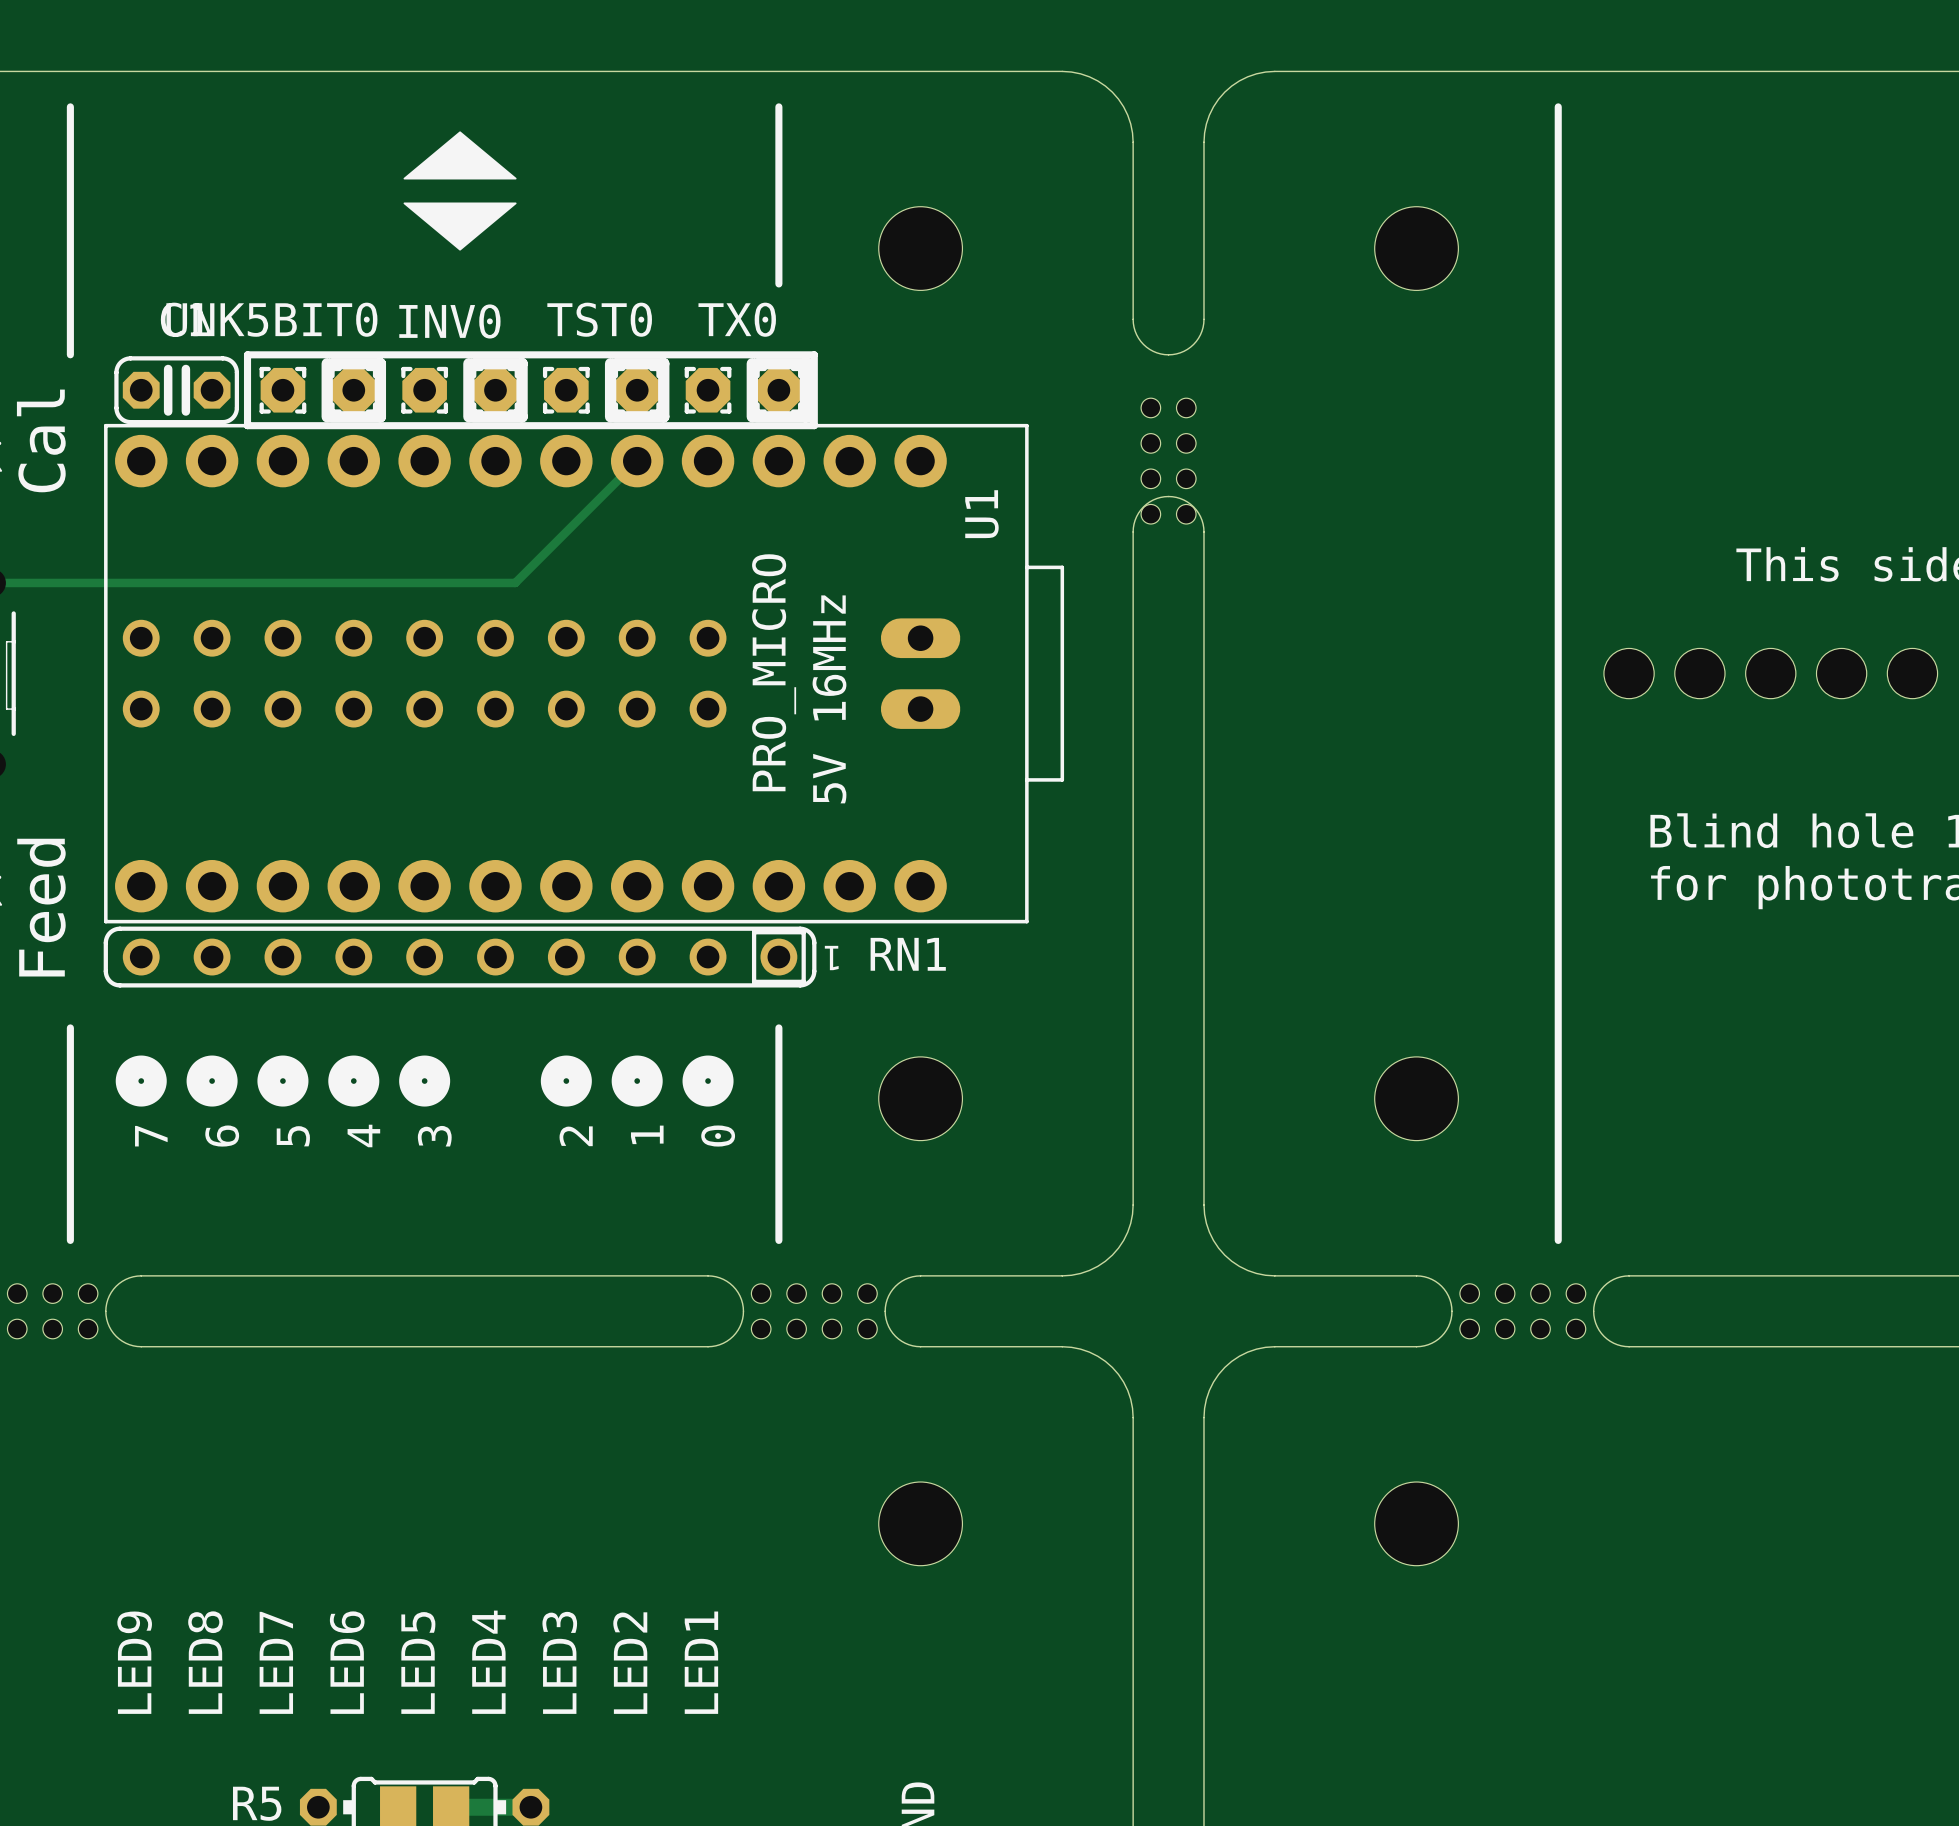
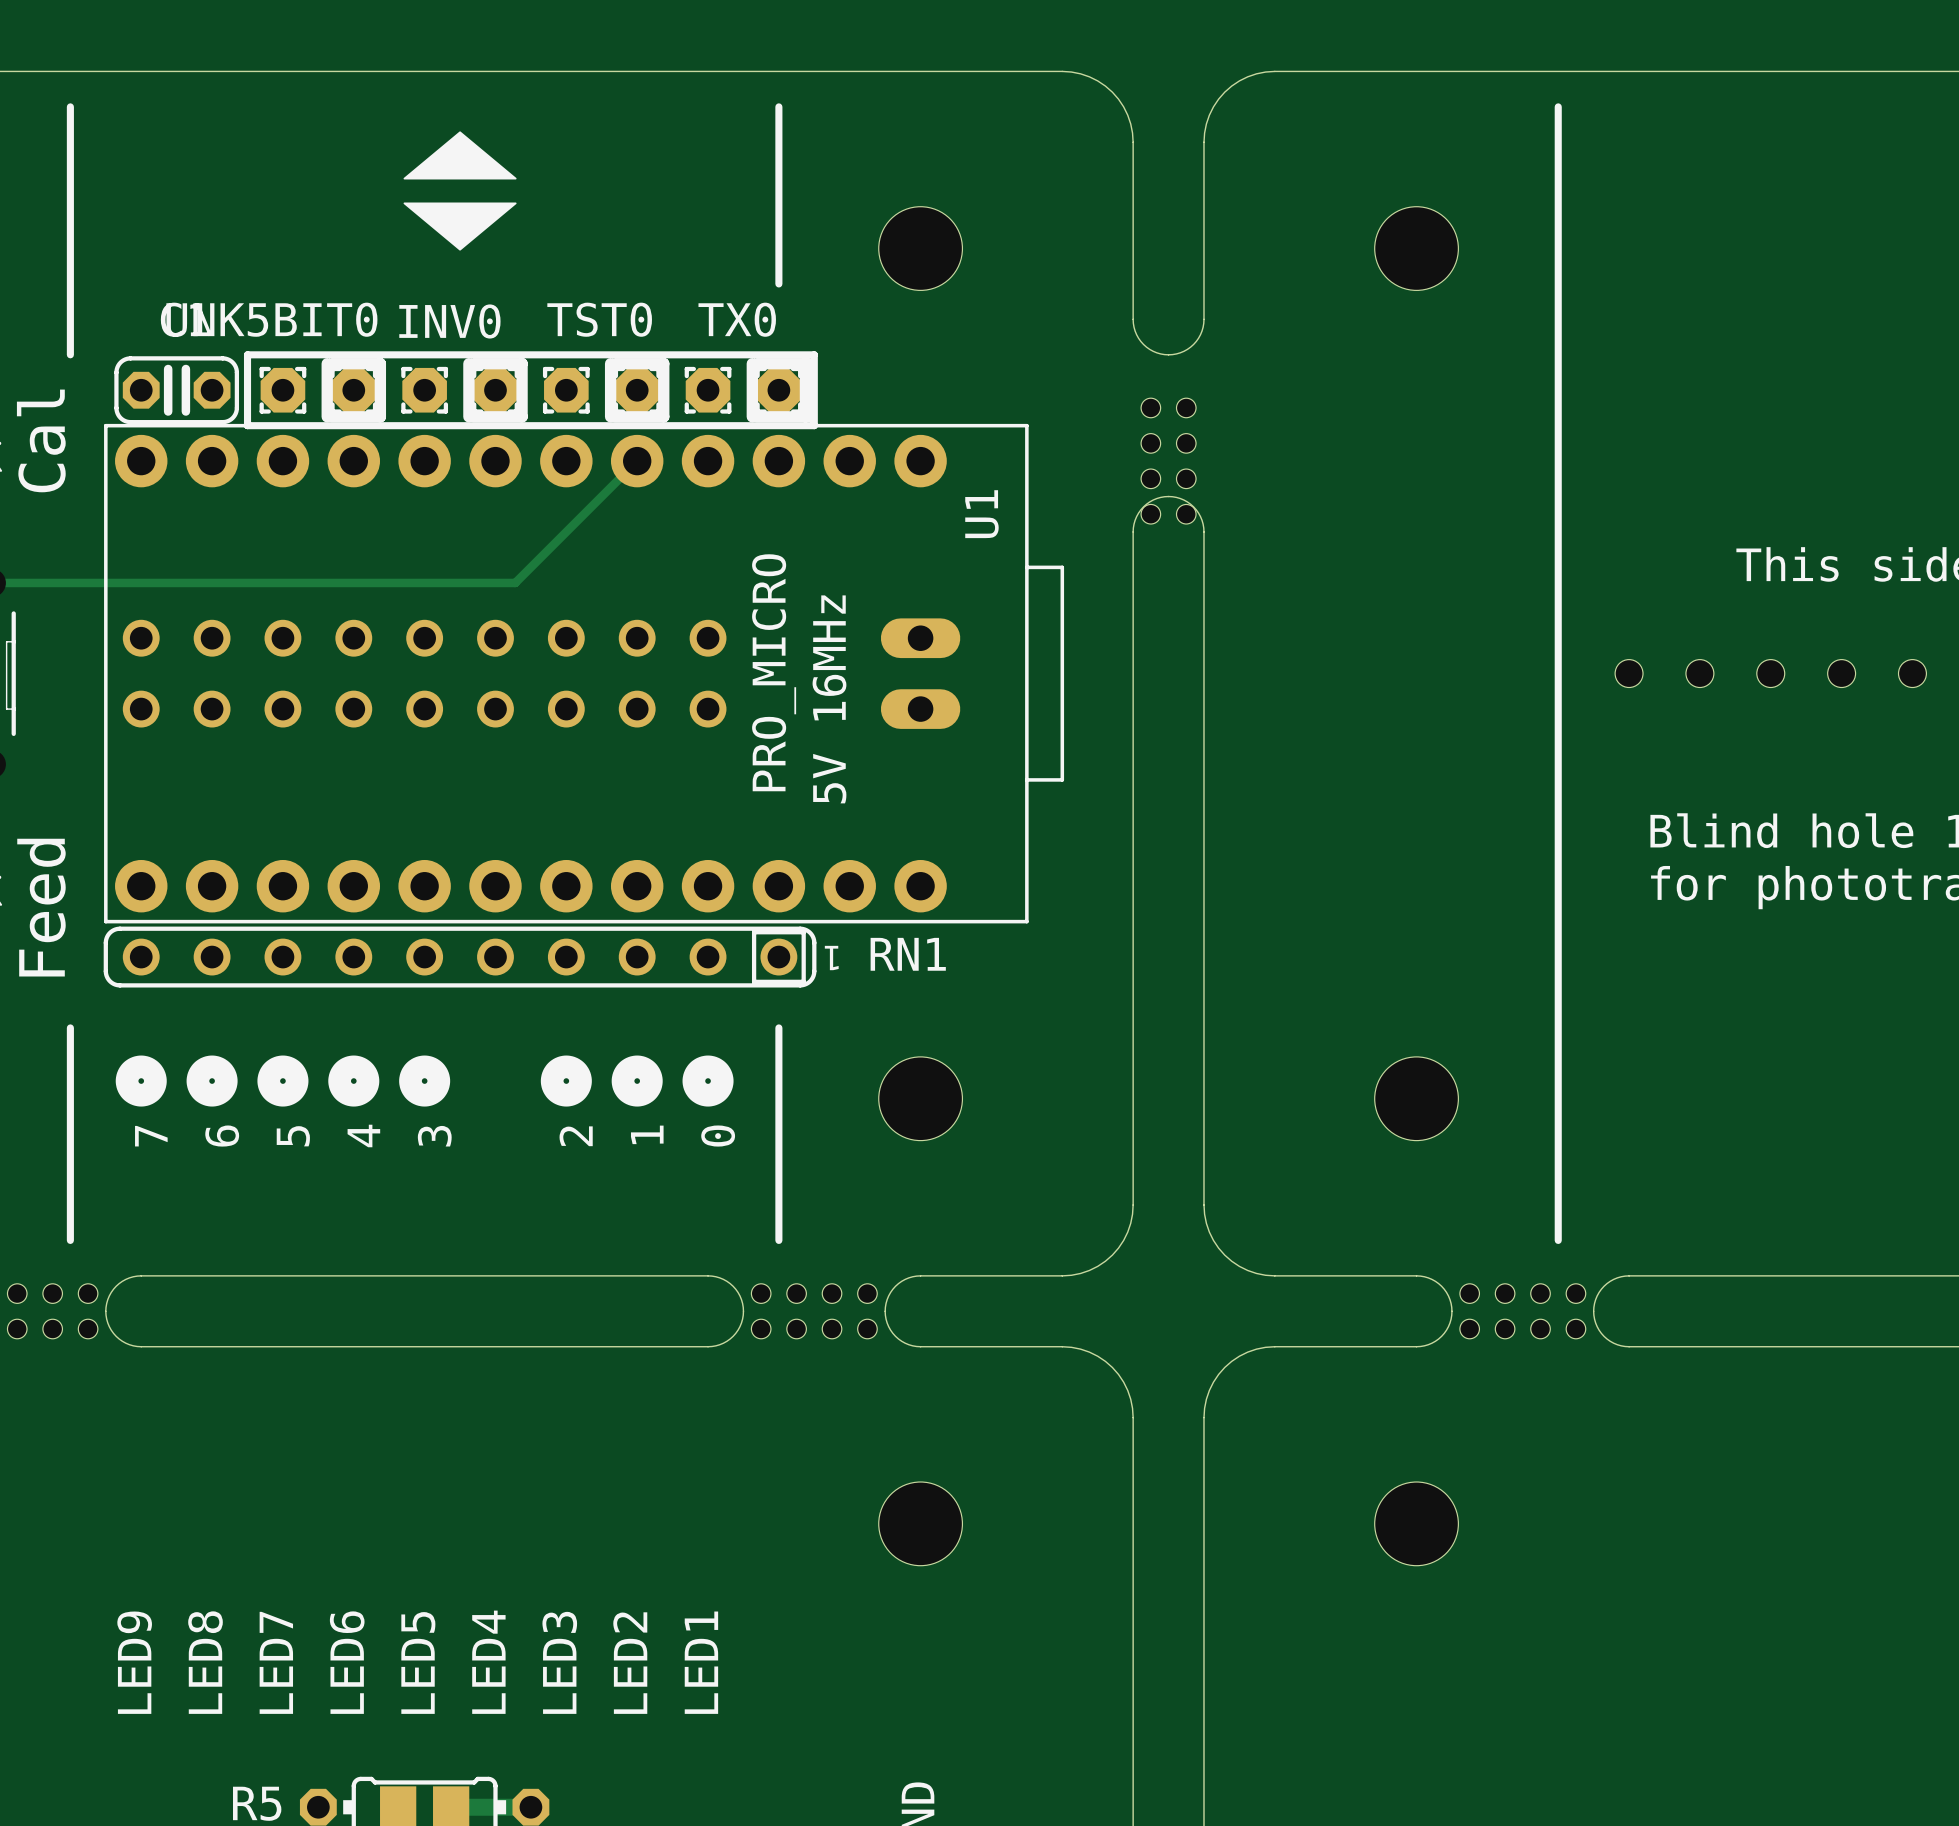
part footprint: [1603, 648, 1655, 699] -> [1615, 659, 1644, 688]
part footprint: [1674, 648, 1726, 699] -> [1685, 659, 1714, 688]
part footprint: [1745, 648, 1796, 699] -> [1756, 659, 1785, 688]
part footprint: [1816, 648, 1867, 699] -> [1827, 659, 1856, 688]
part footprint: [1887, 648, 1938, 699] -> [1898, 659, 1927, 688]

